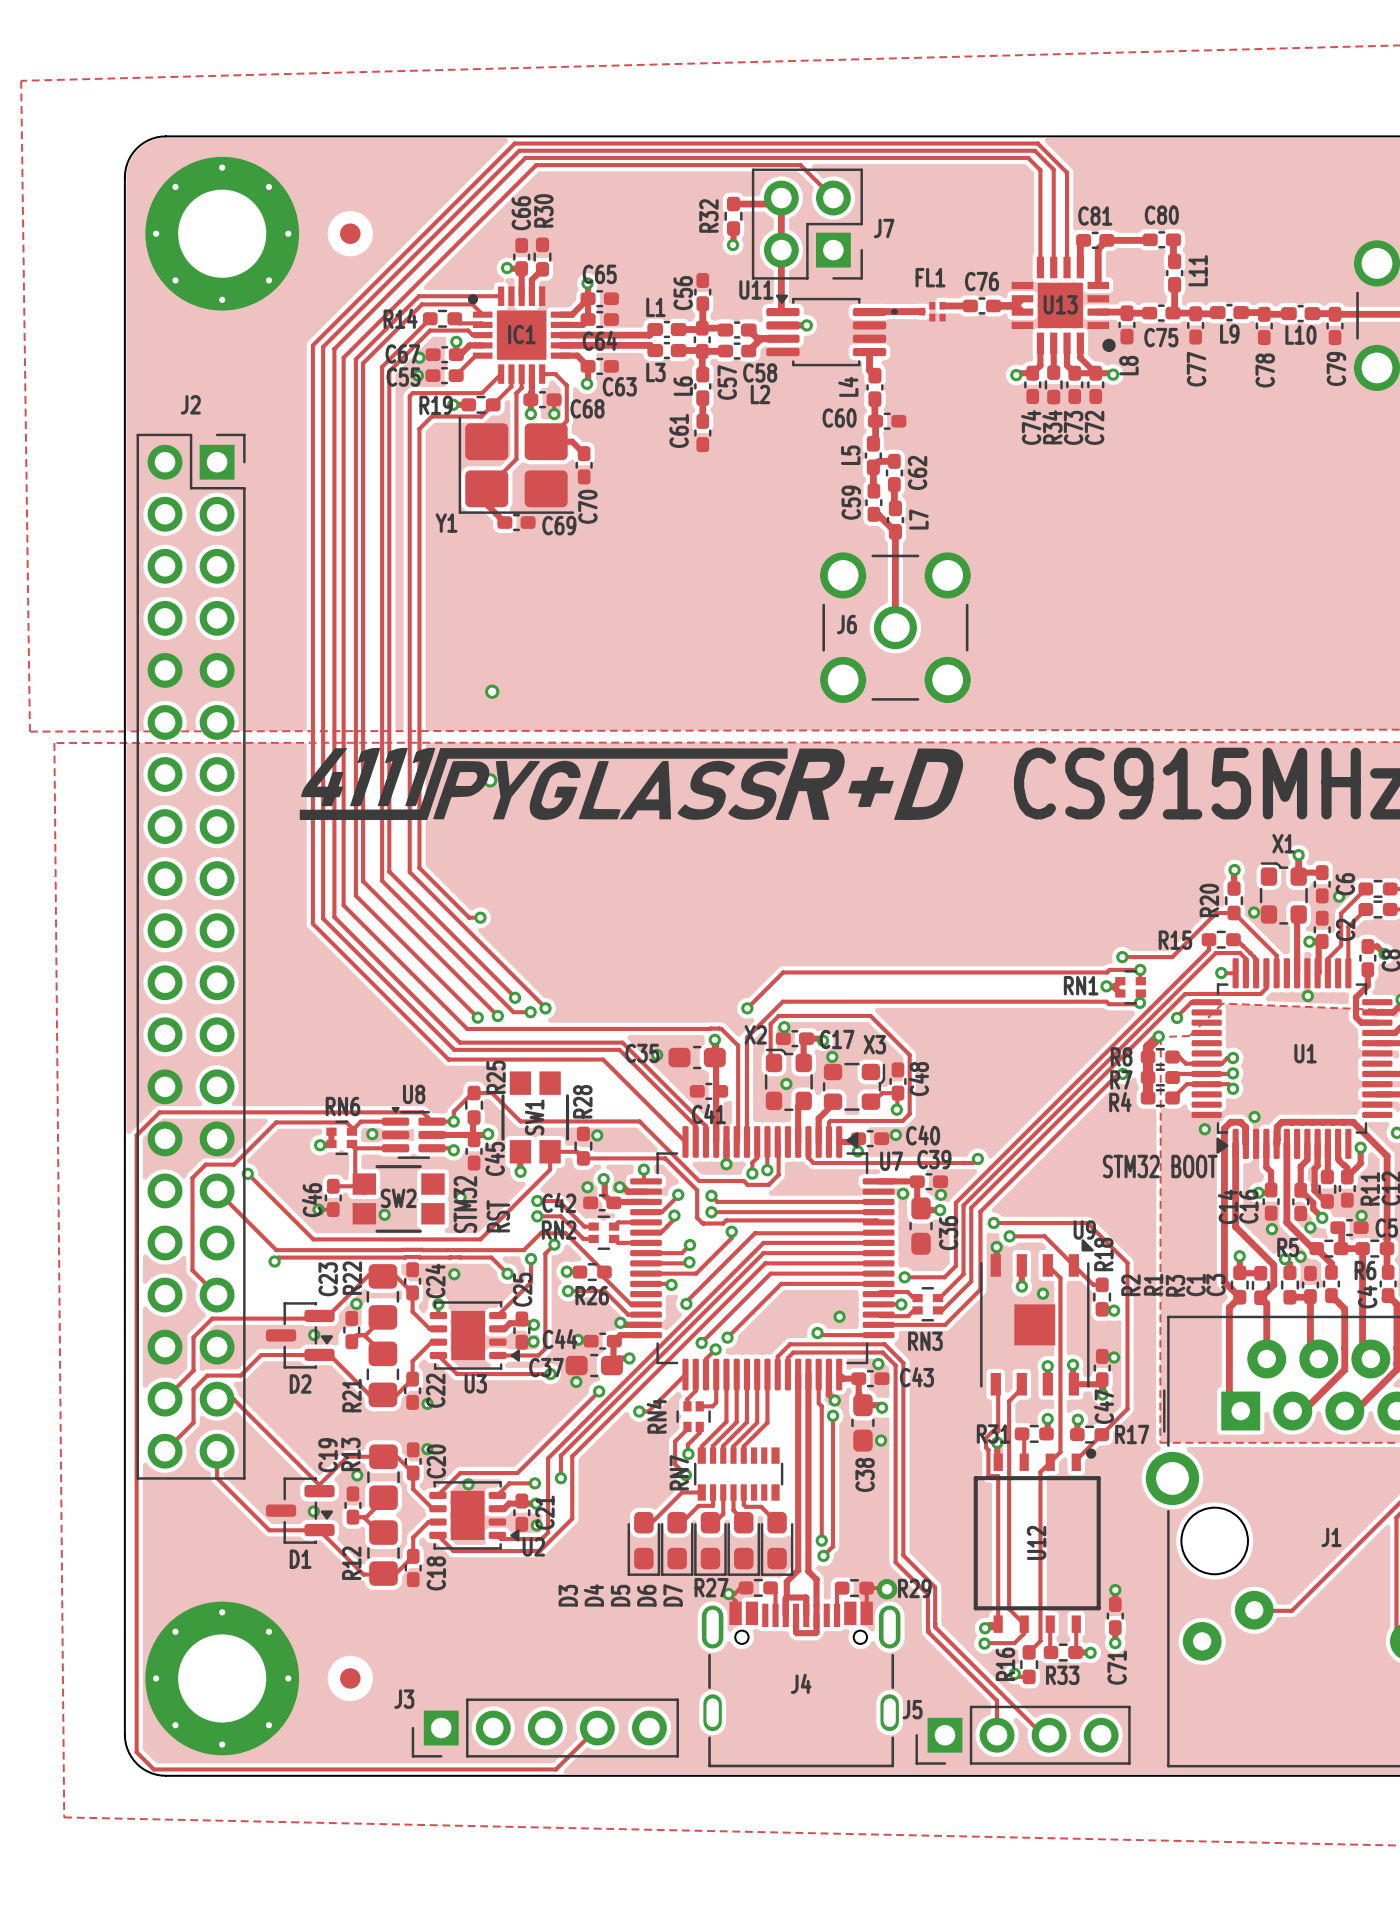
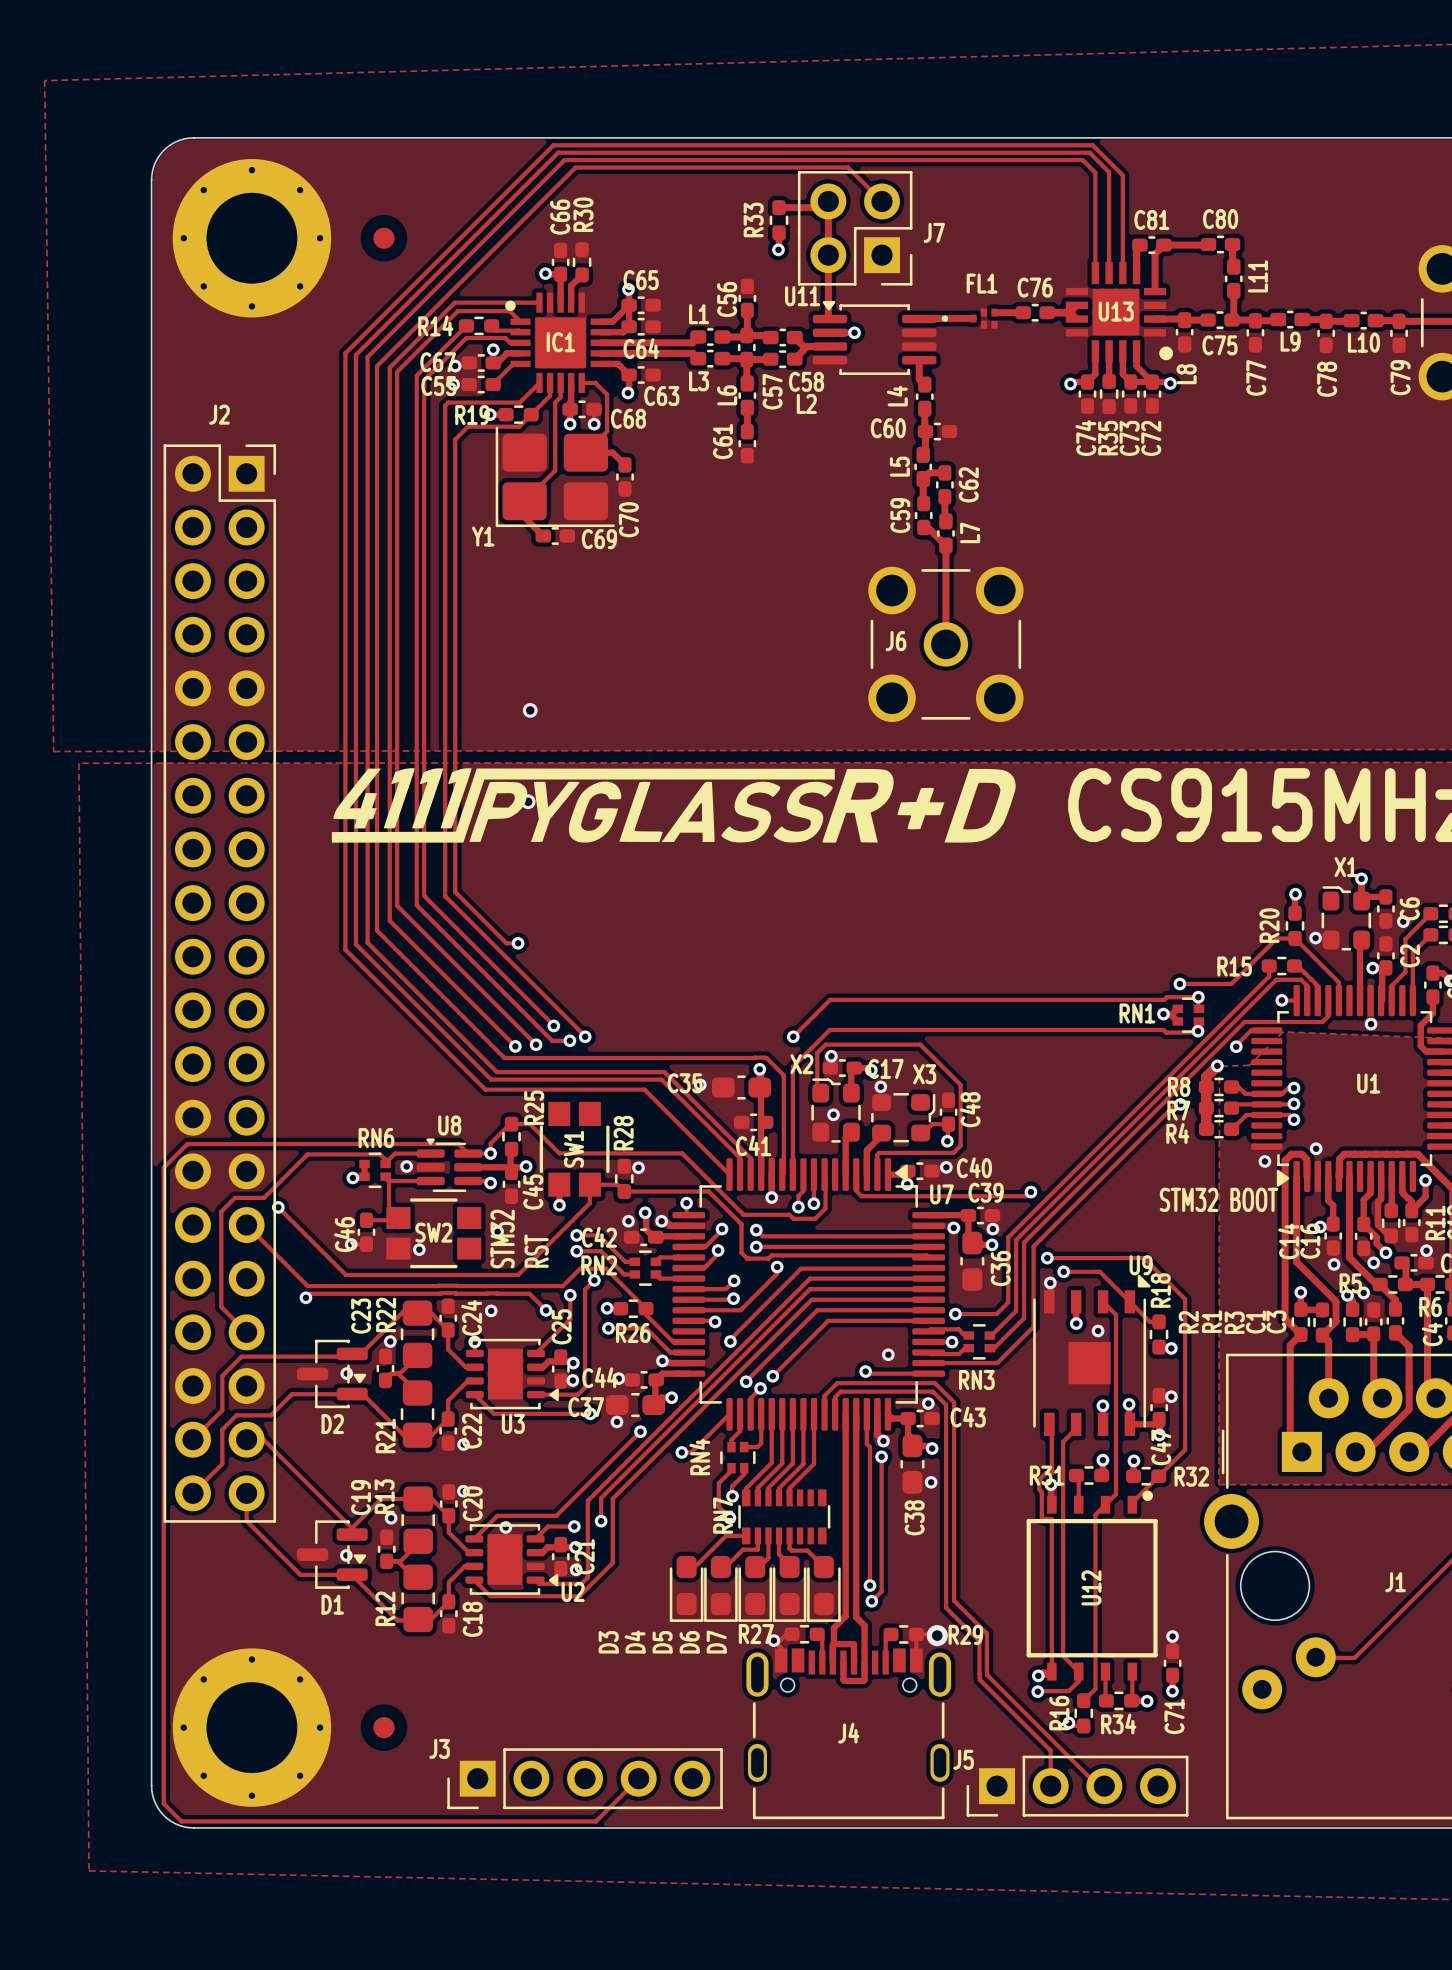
R32 name: R32 (708, 215) -> R33 (753, 219)
R34 name: R34 (1052, 427) -> R35 (1108, 438)
R17 name: R17 (1132, 1434) -> R32 (1191, 1476)
R33 name: R33 (1062, 1675) -> R34 (1118, 1723)

